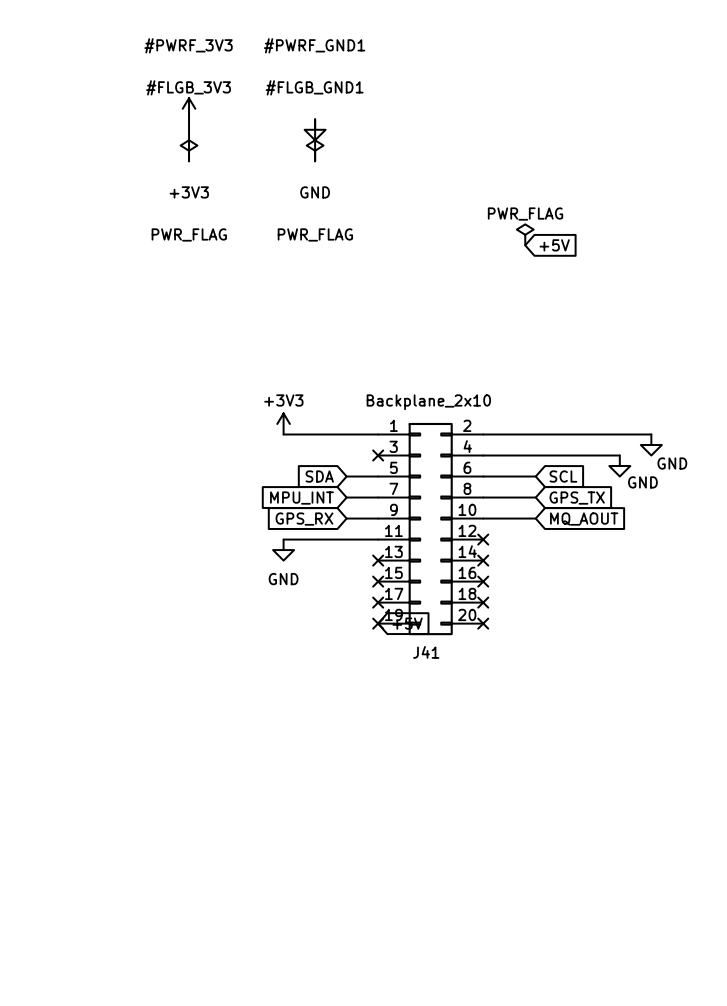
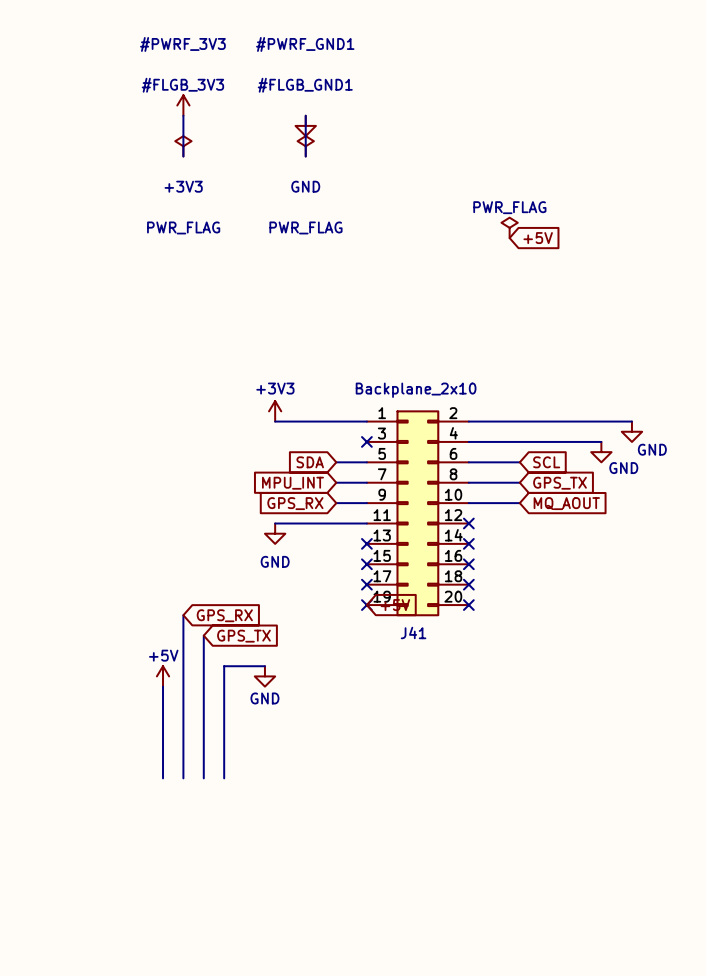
wire: none -> (183, 615) (183, 778)
global label: none -> GPS_RX (224, 615)
wire: none -> (203, 635) (203, 778)
global label: none -> GPS_TX (243, 636)
wire: none -> (264, 666) (224, 666) (224, 778)
power symbol: none -> +5V (163, 676)
power symbol: none -> GND (264, 676)
wire: none -> (163, 686) (163, 778)

